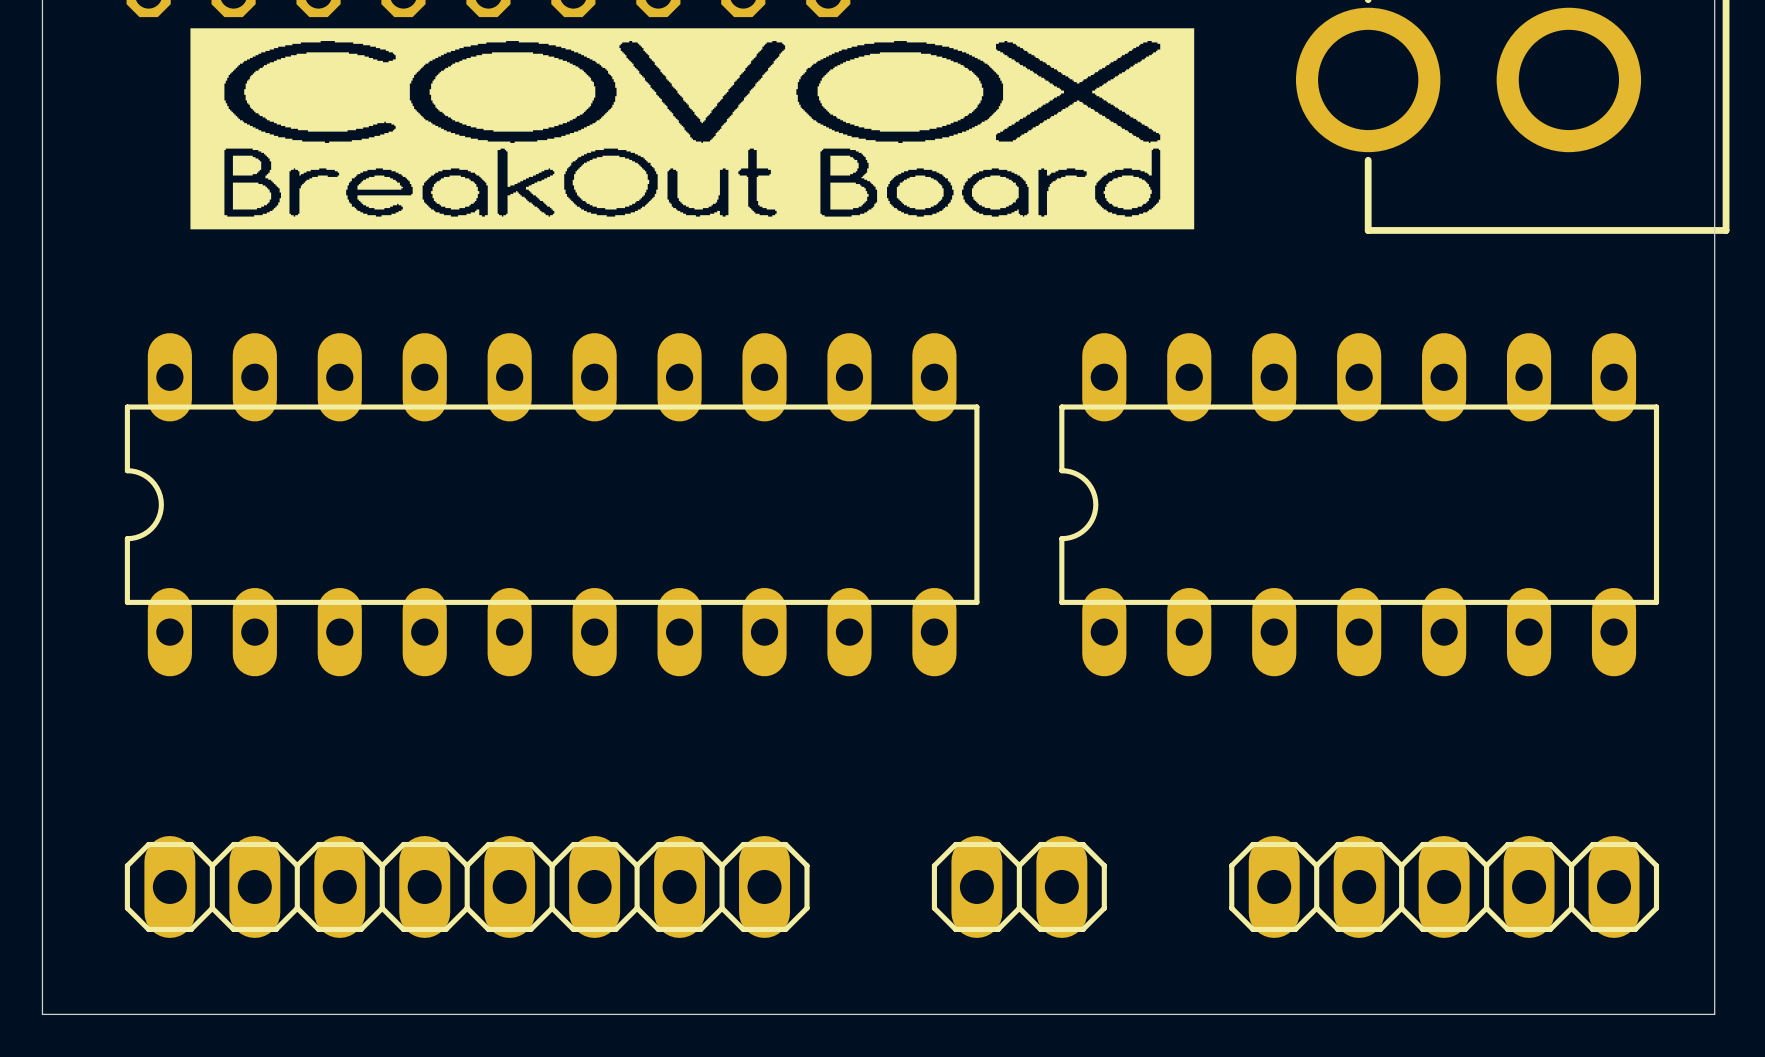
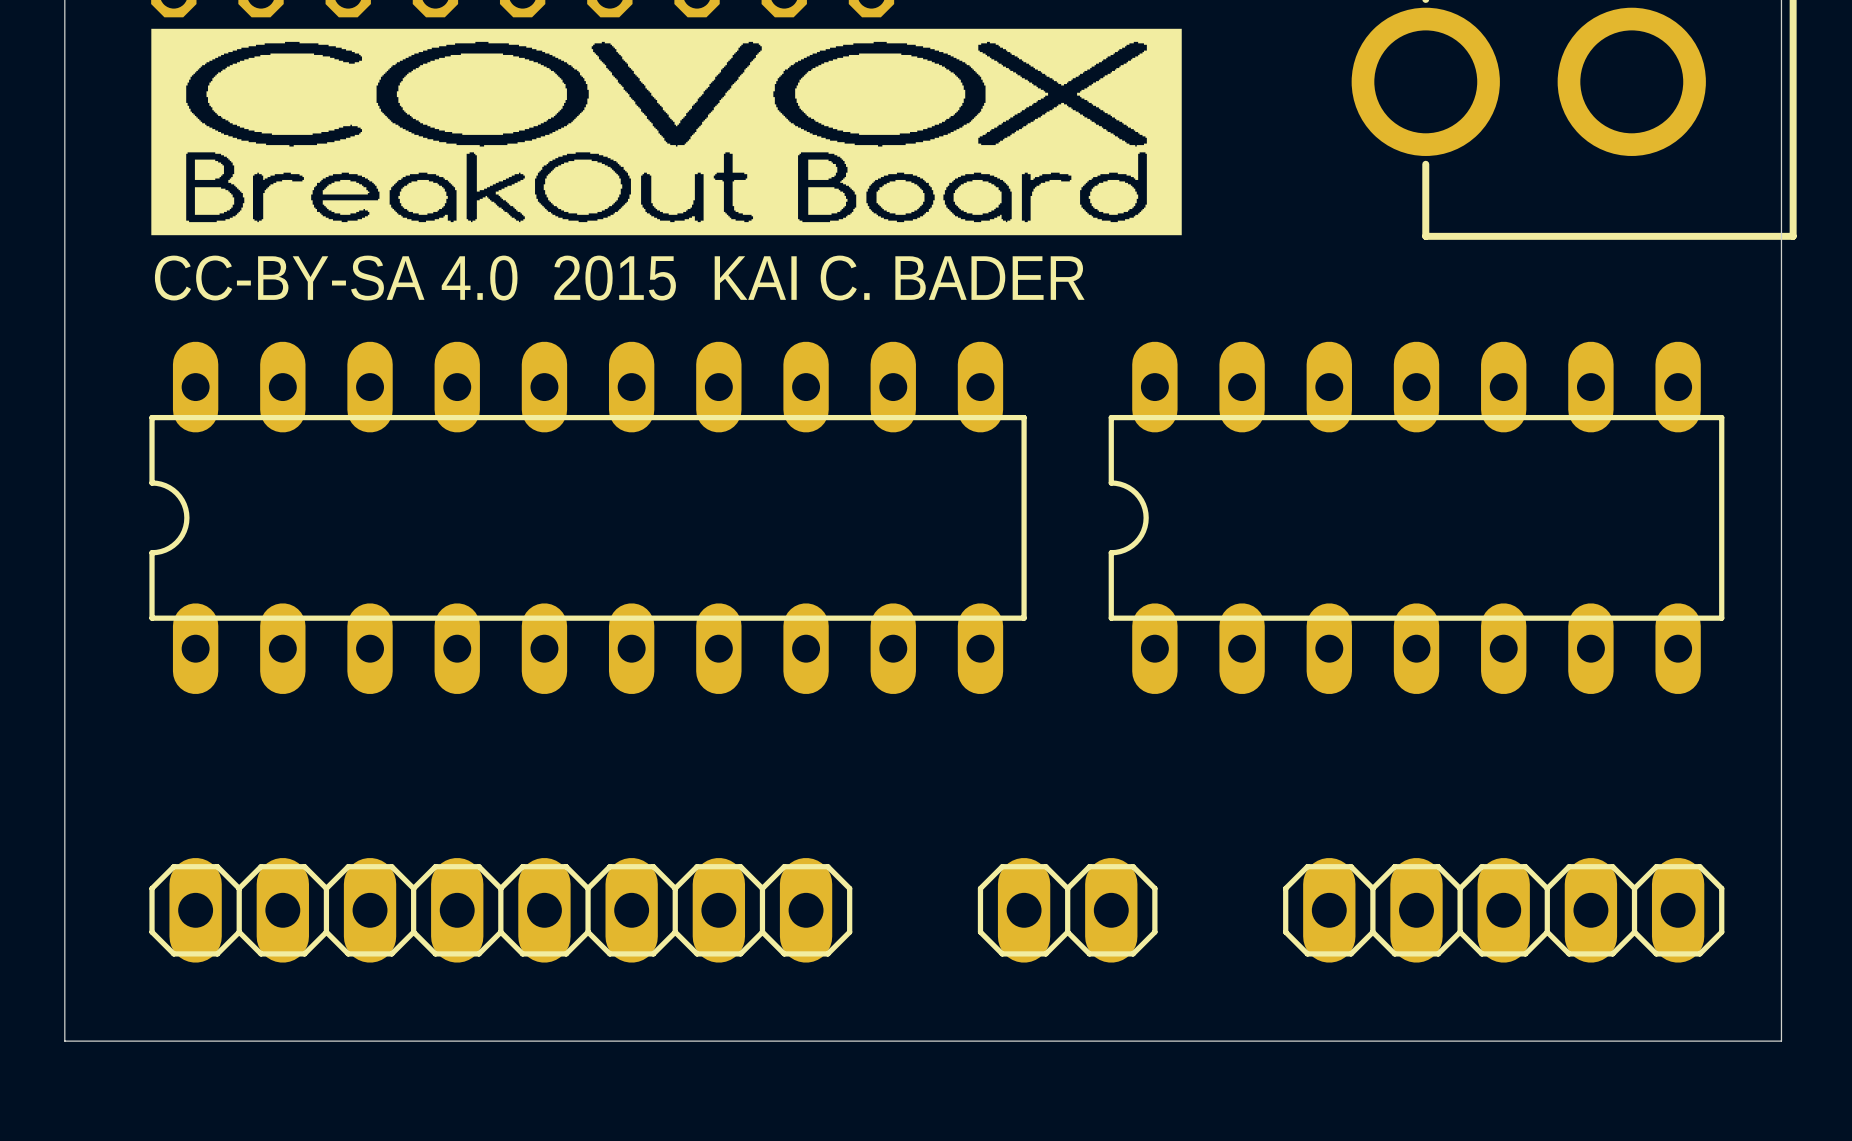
drawing position: (692, 128) -> (666, 131)
text: none -> CC-BY-SA 4.0 2015 KAI C. BADER (619, 278)

